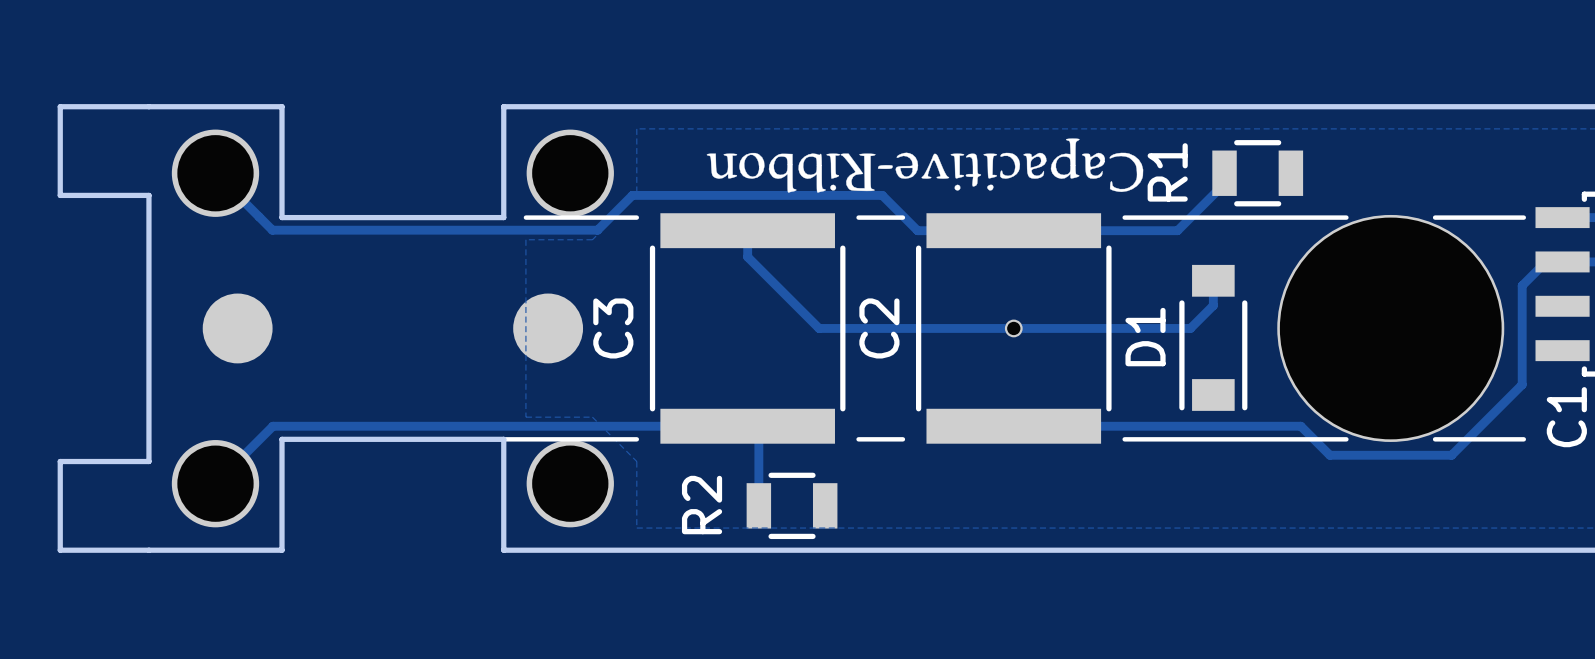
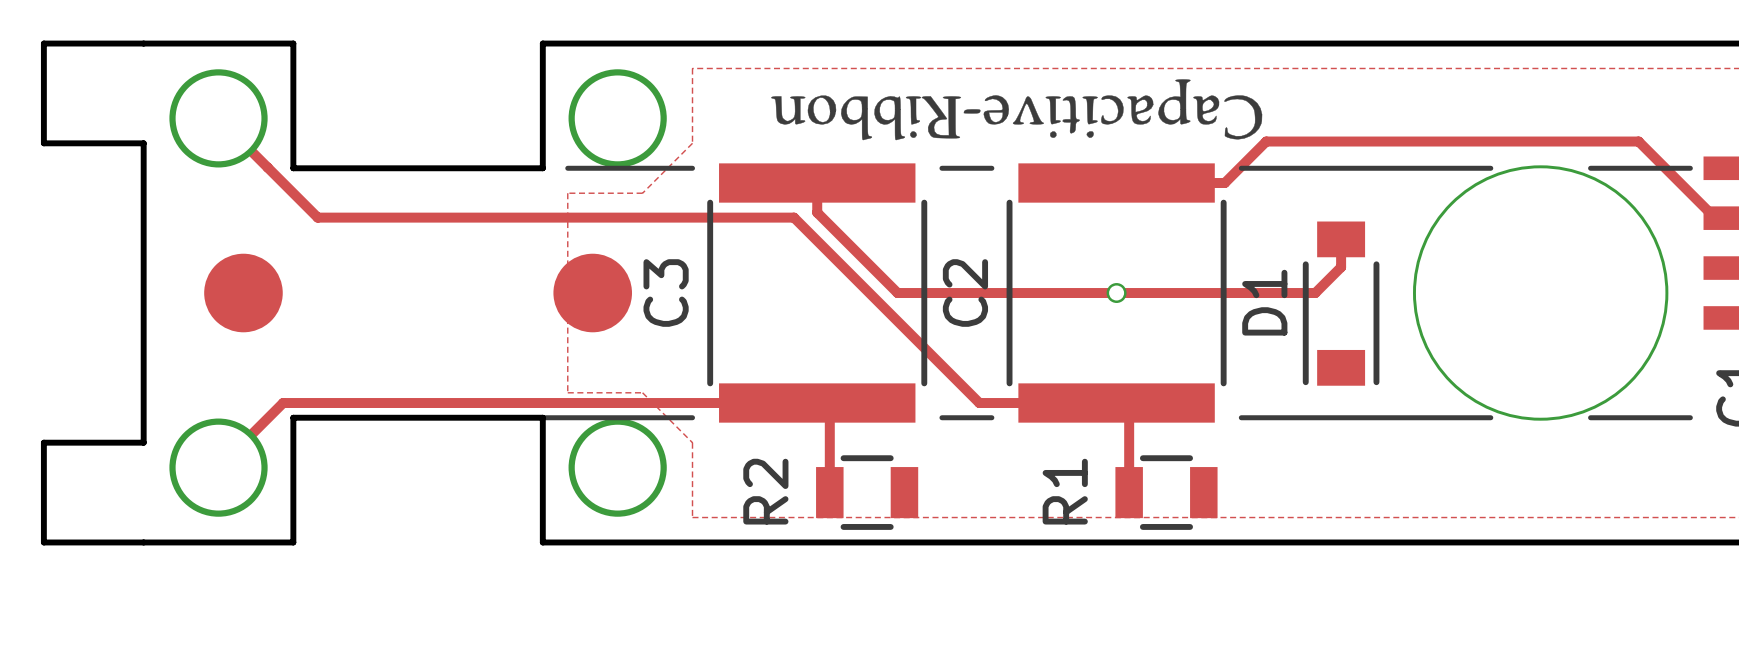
track: (1224, 173) (1224, 183) (1177, 230) (1109, 230) -> none
R1 position: (1257, 173) -> (1166, 492)
track: (272, 230) (597, 230) (632, 195) (882, 195) (917, 230) (1013, 230) -> (282, 182) (317, 217) (794, 217) (979, 403) (1116, 403) (1129, 415) (1129, 492)
track: (1545, 261) (1522, 285) (1522, 384) (1451, 455) (1329, 455) (1300, 426) (1013, 426) -> (1715, 218) (1638, 141) (1266, 141) (1224, 183)

